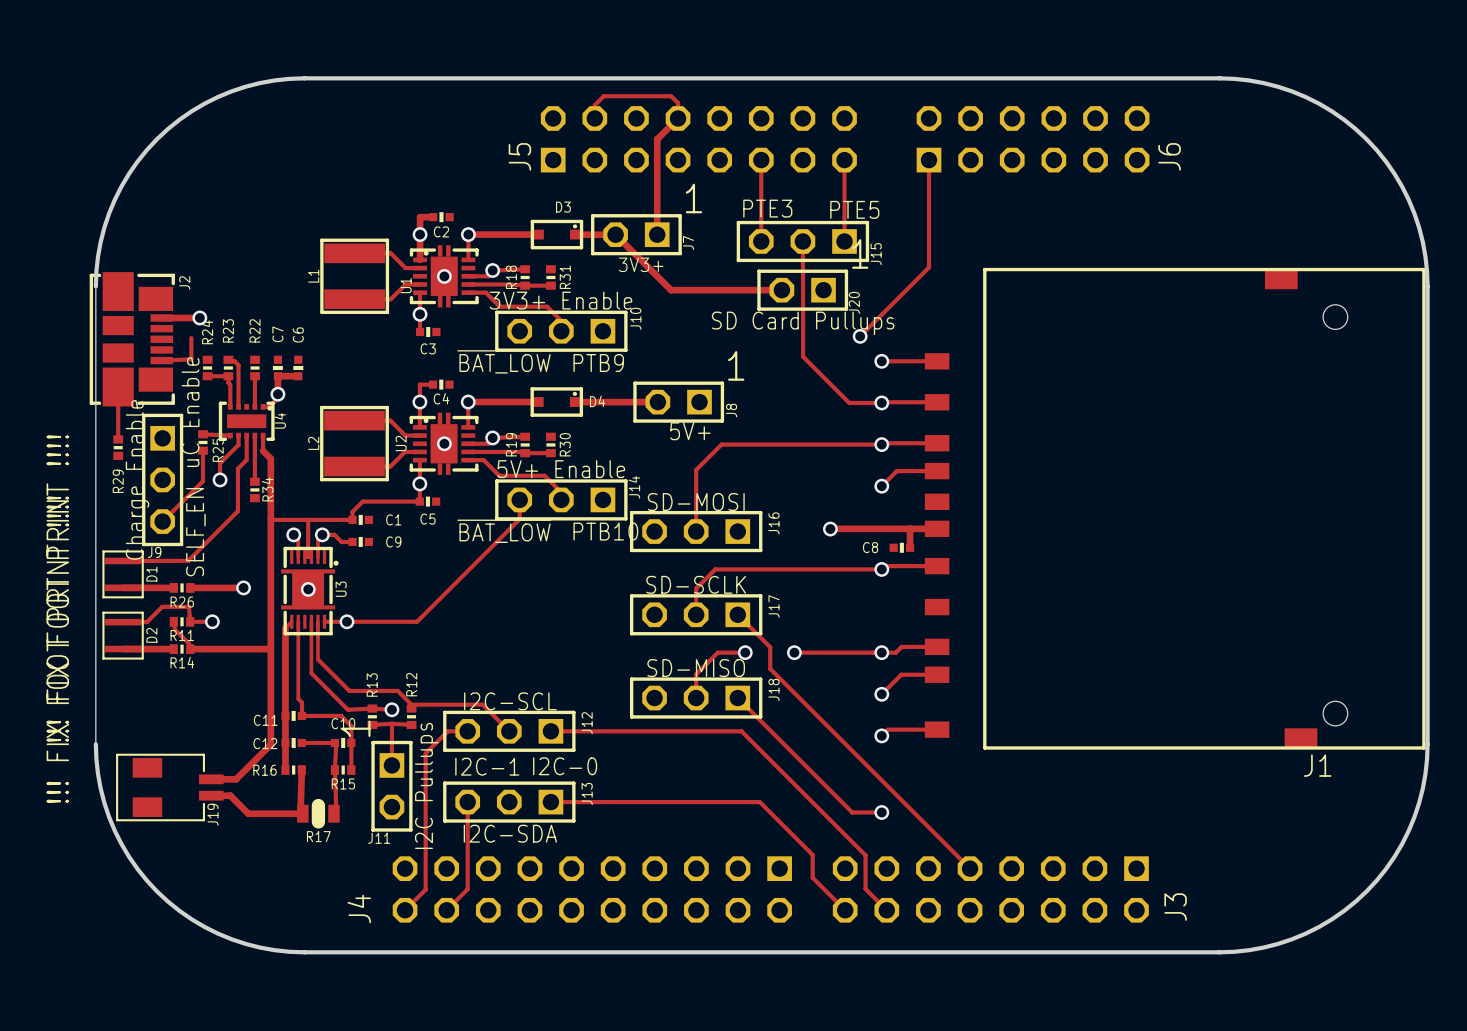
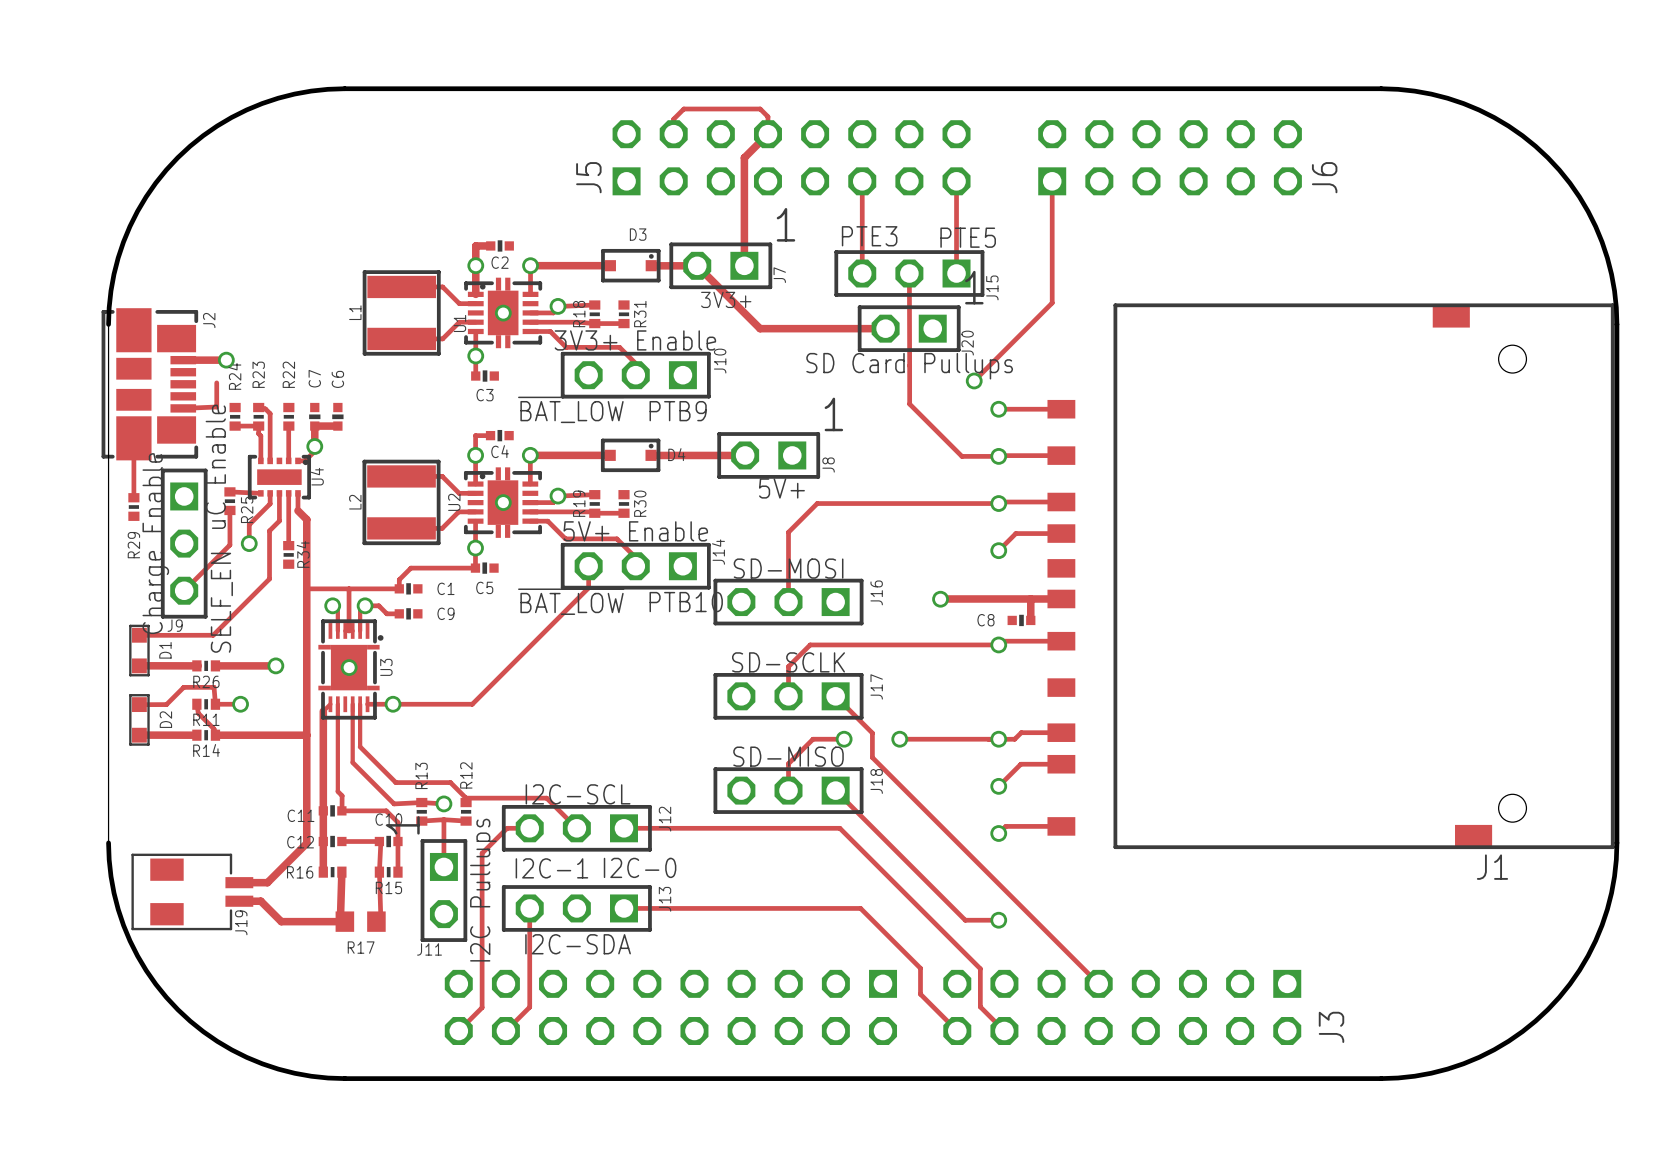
D1 footprint: [102, 550, 144, 599] -> [129, 624, 150, 677]
D2 footprint: [102, 611, 144, 660] -> [129, 694, 150, 746]
R17 footprint: [297, 798, 340, 829] -> [335, 911, 386, 932]
J4 name: J4 (359, 908) -> none

